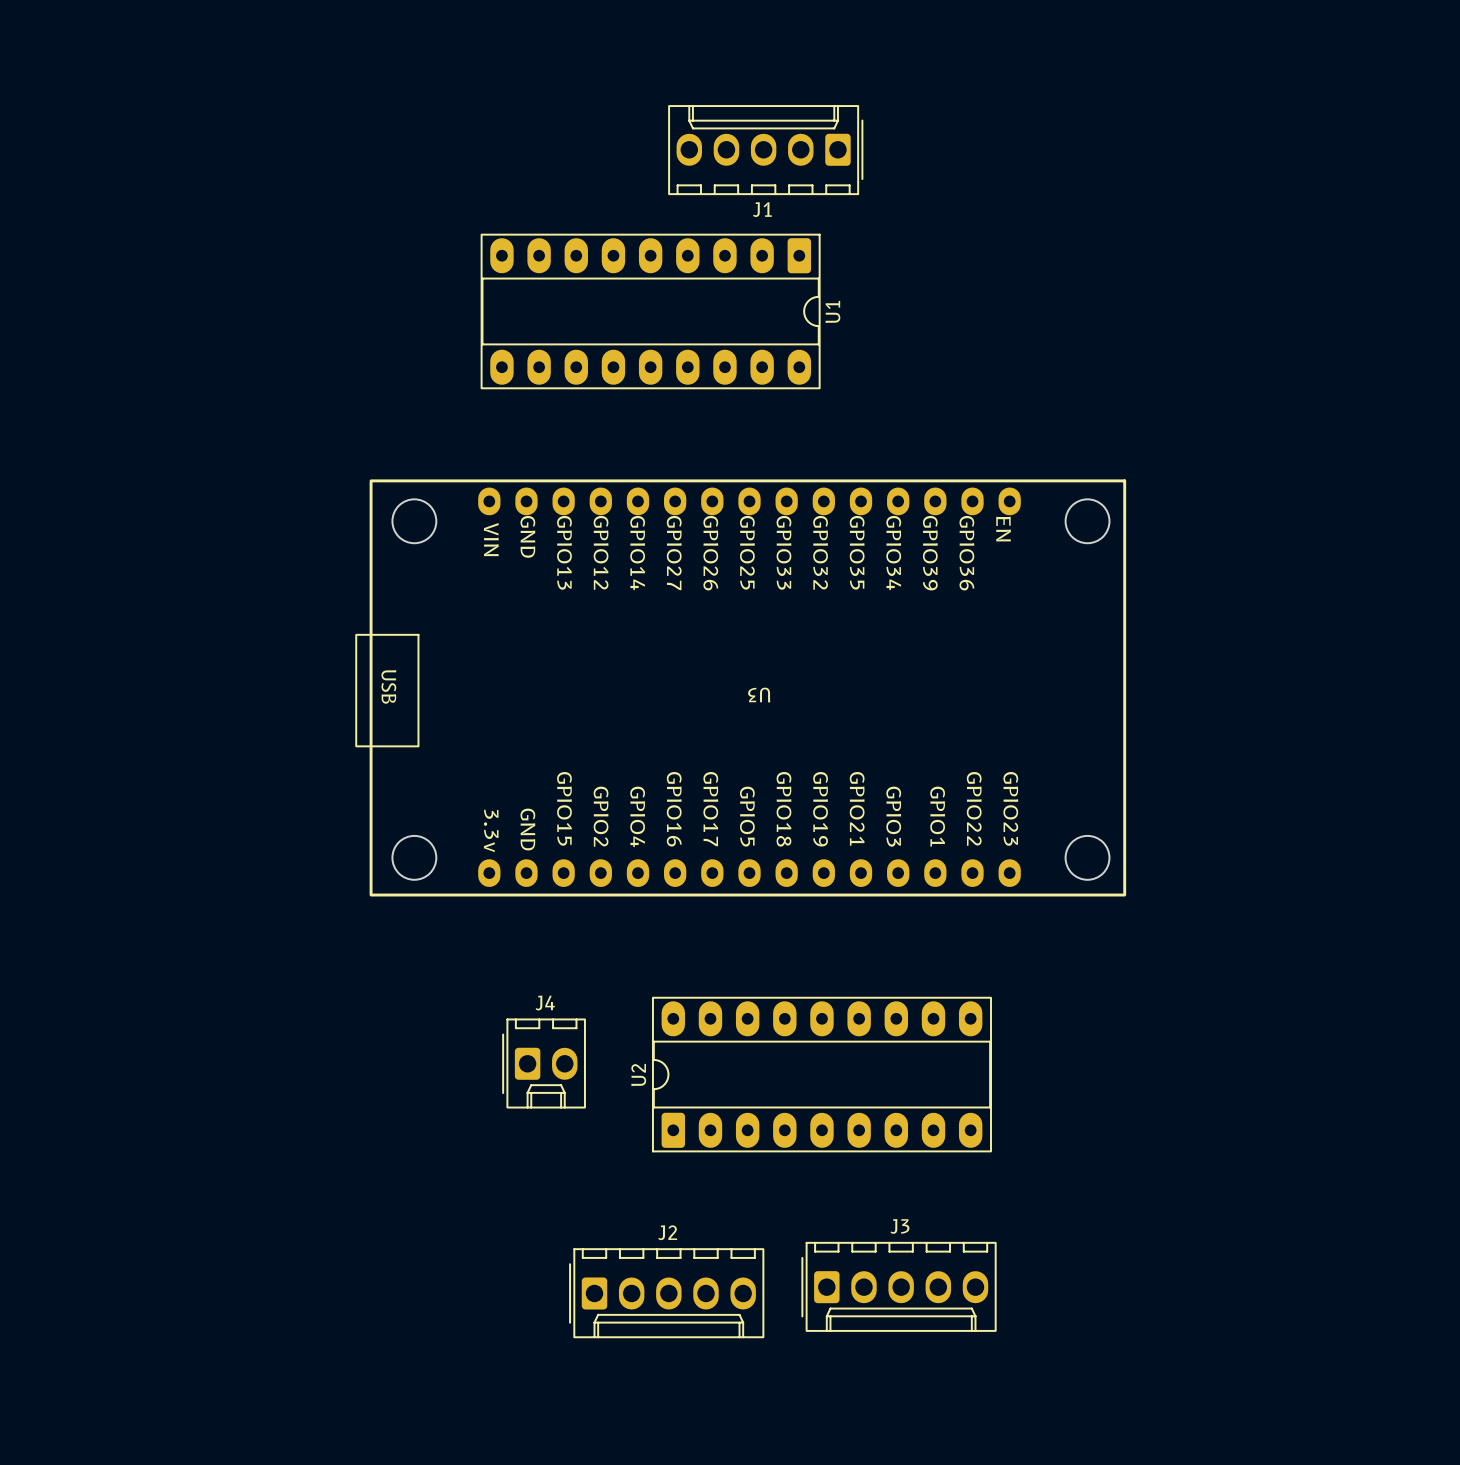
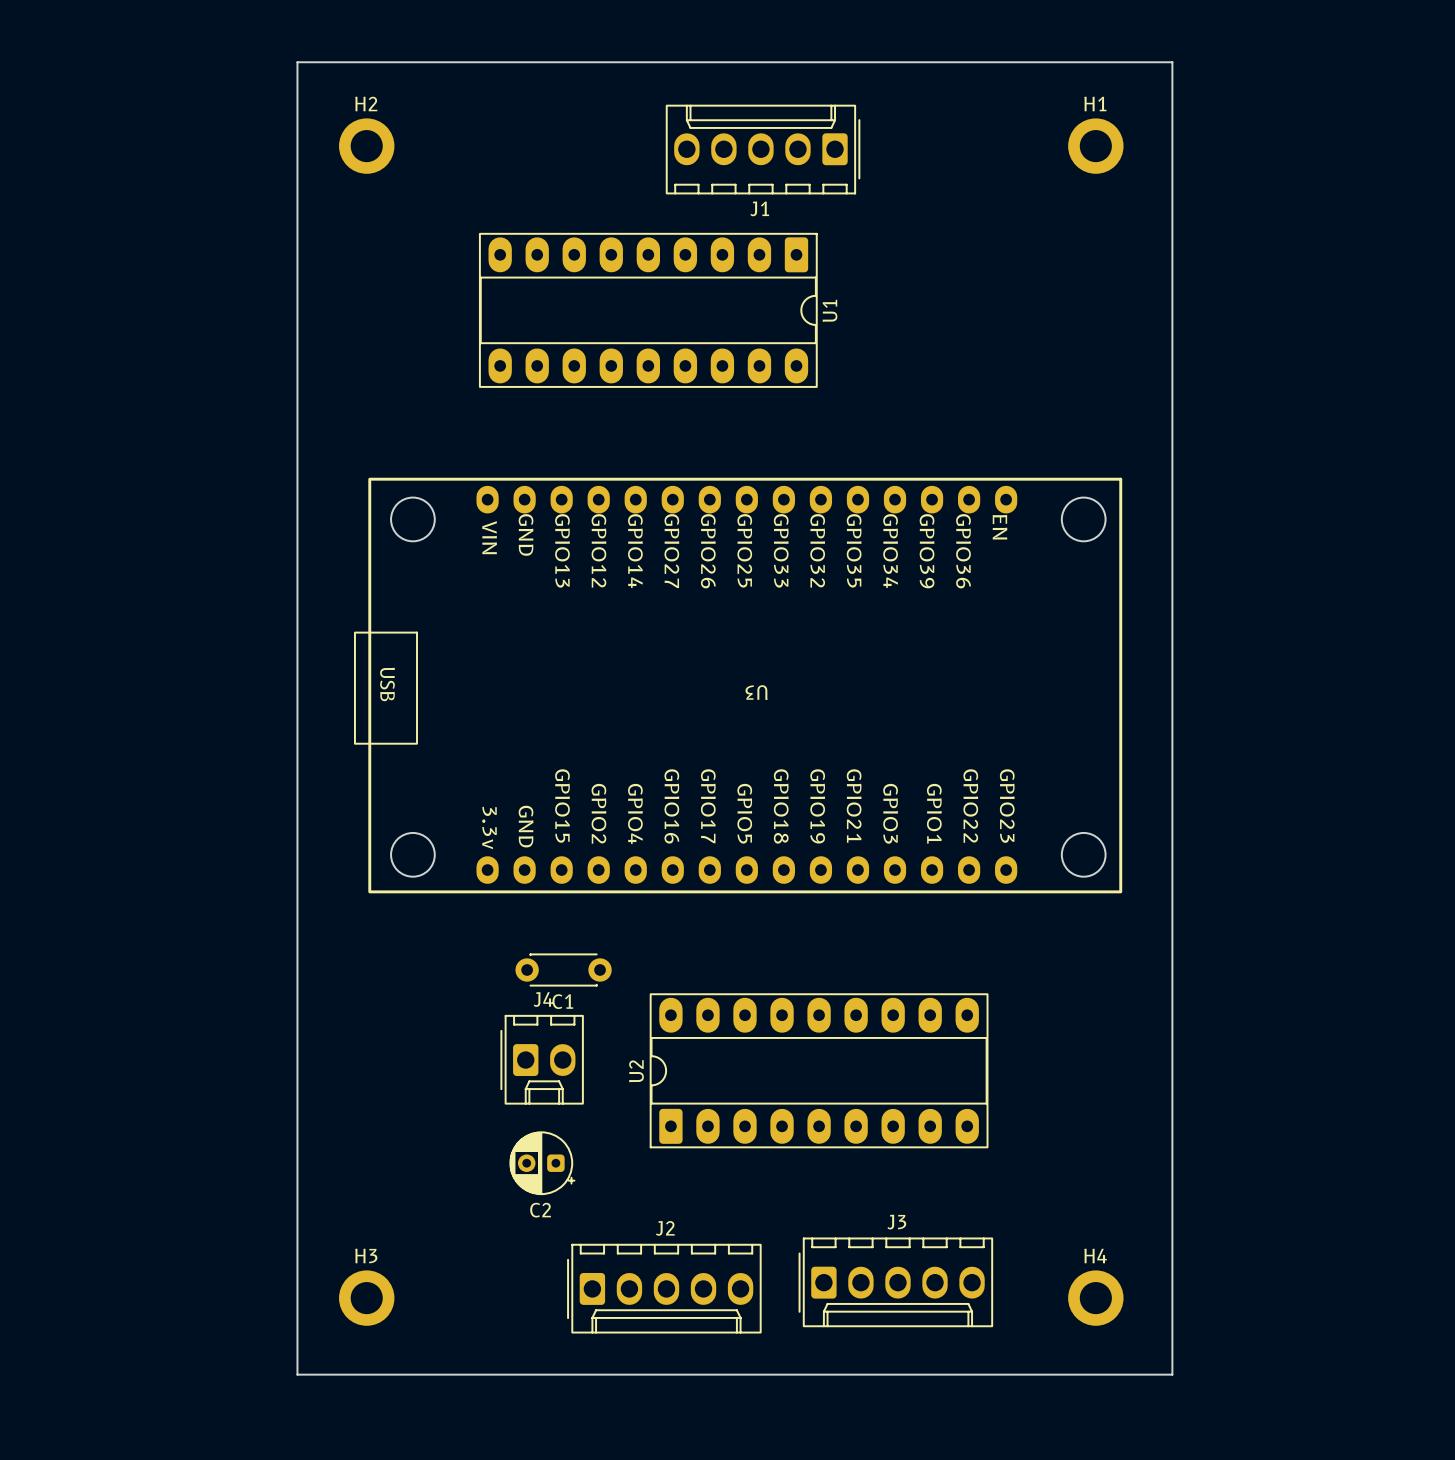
board edge: none -> (297, 62) (1172, 62) (1172, 1374) (297, 1374) (297, 62)
H2: none -> (366, 146)
H1: none -> (1095, 146)
C1: none -> (563, 969)
C2: none -> (542, 1163)
H3: none -> (366, 1298)
H4: none -> (1095, 1298)

